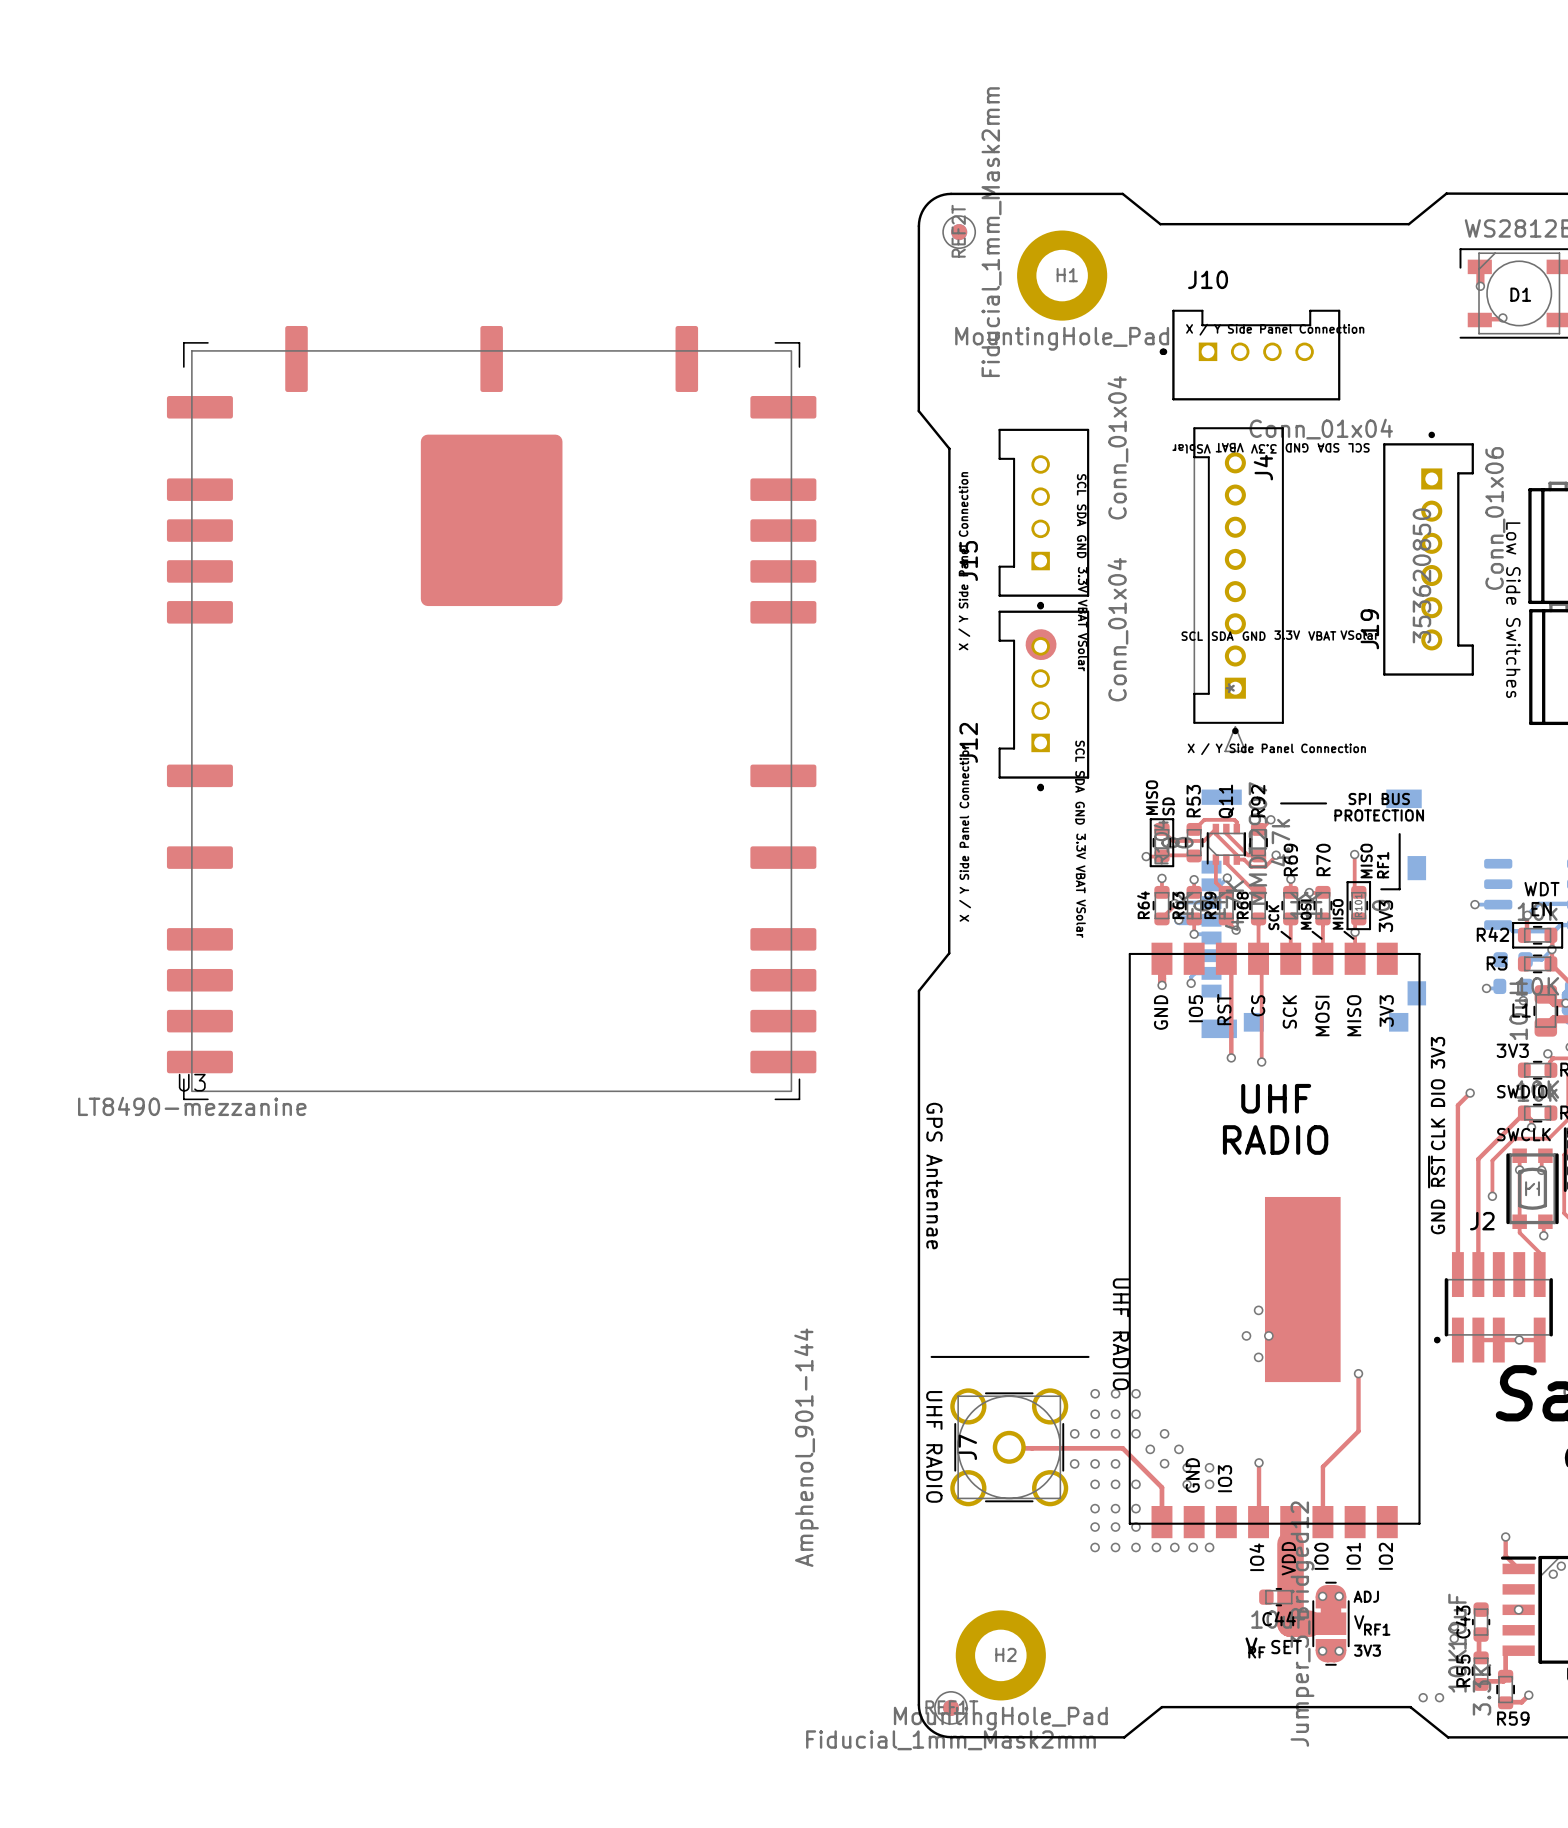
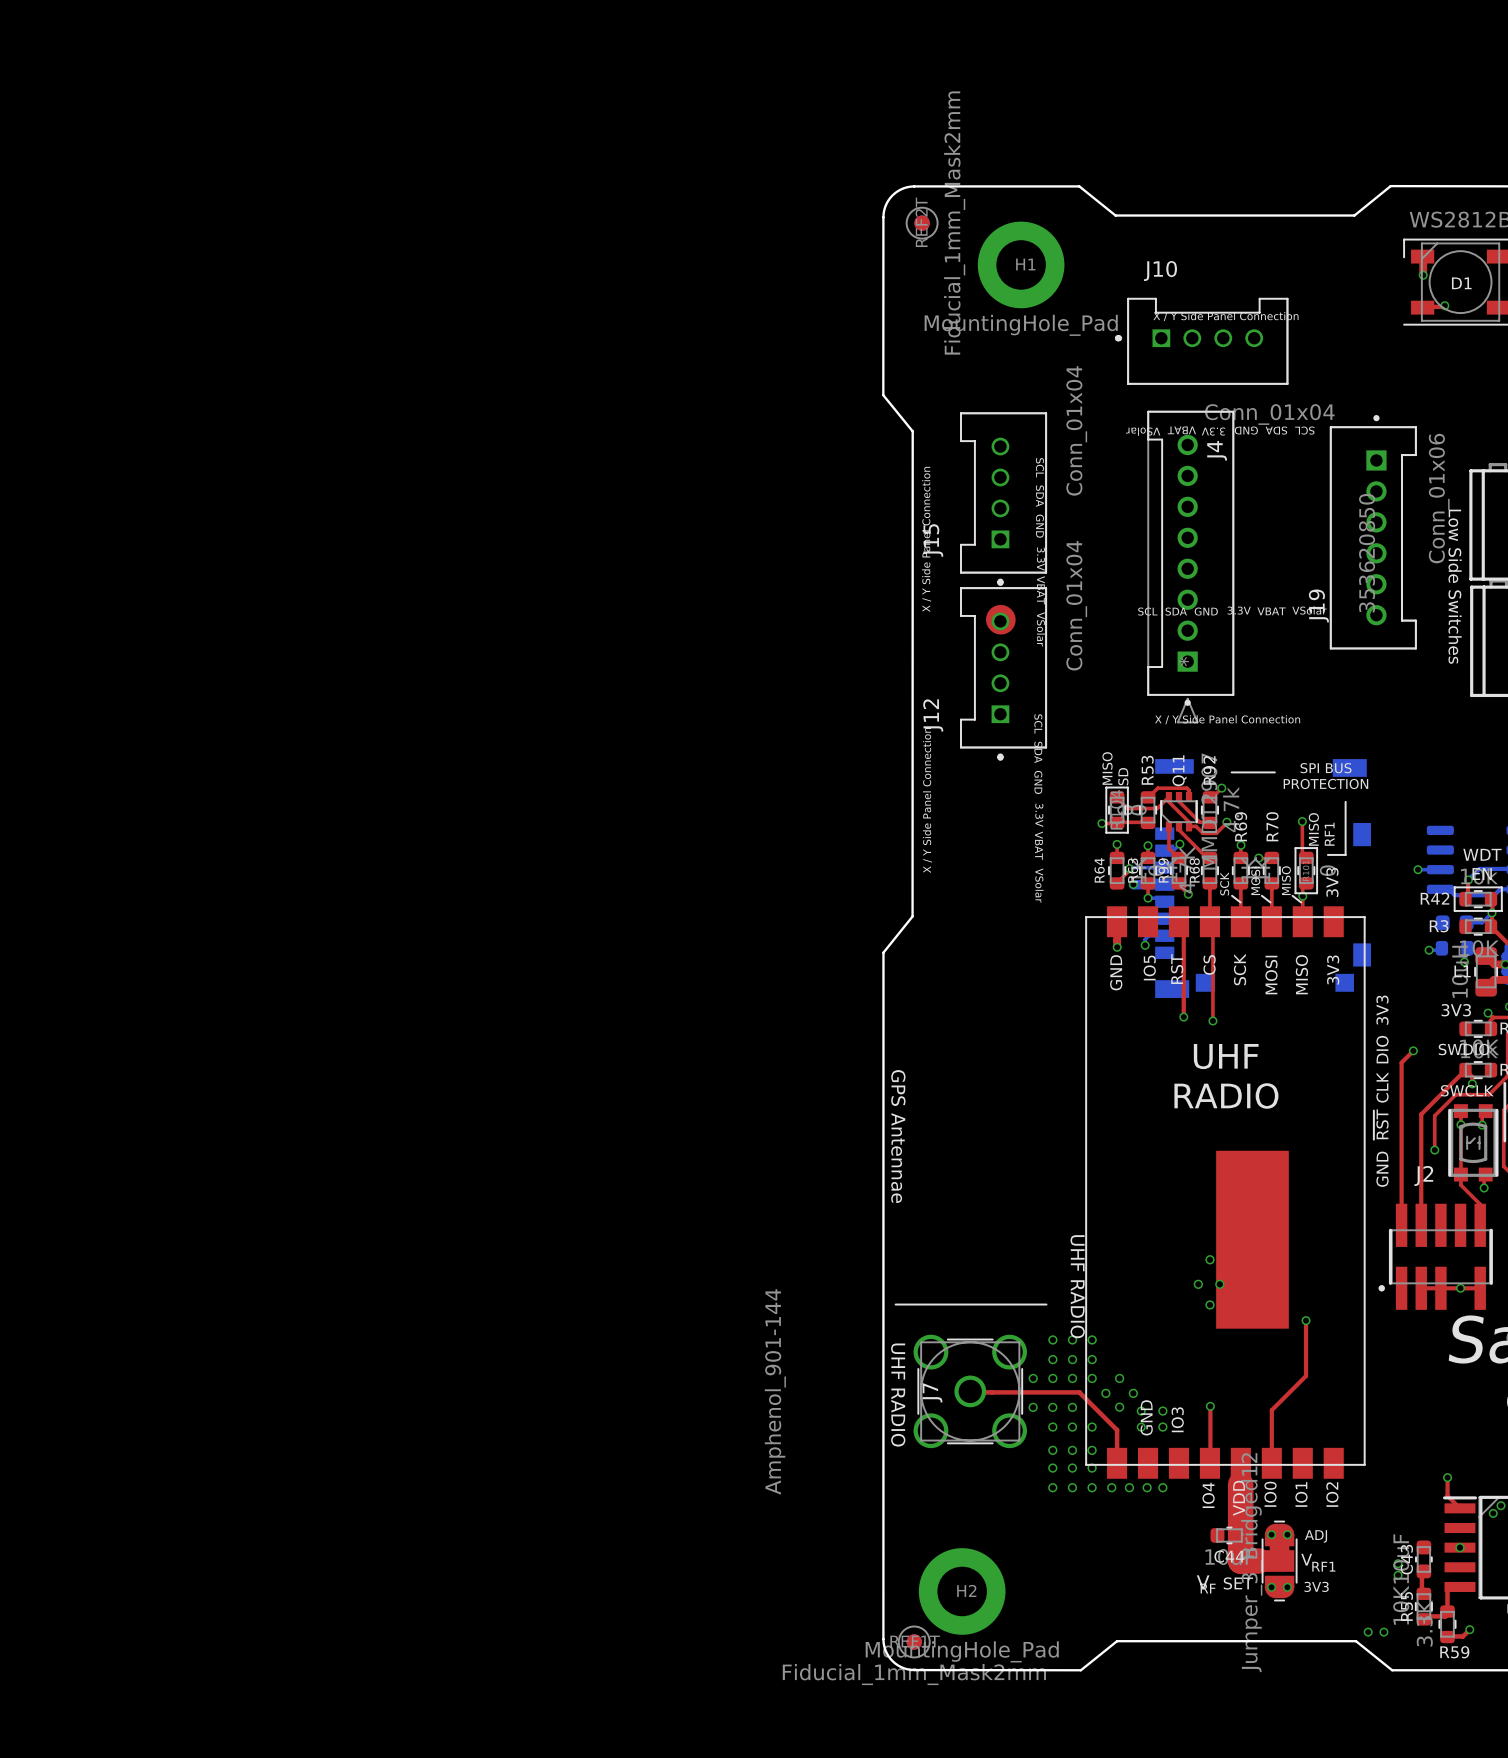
U3: LT8490-mezzanine (491, 713) -> none

